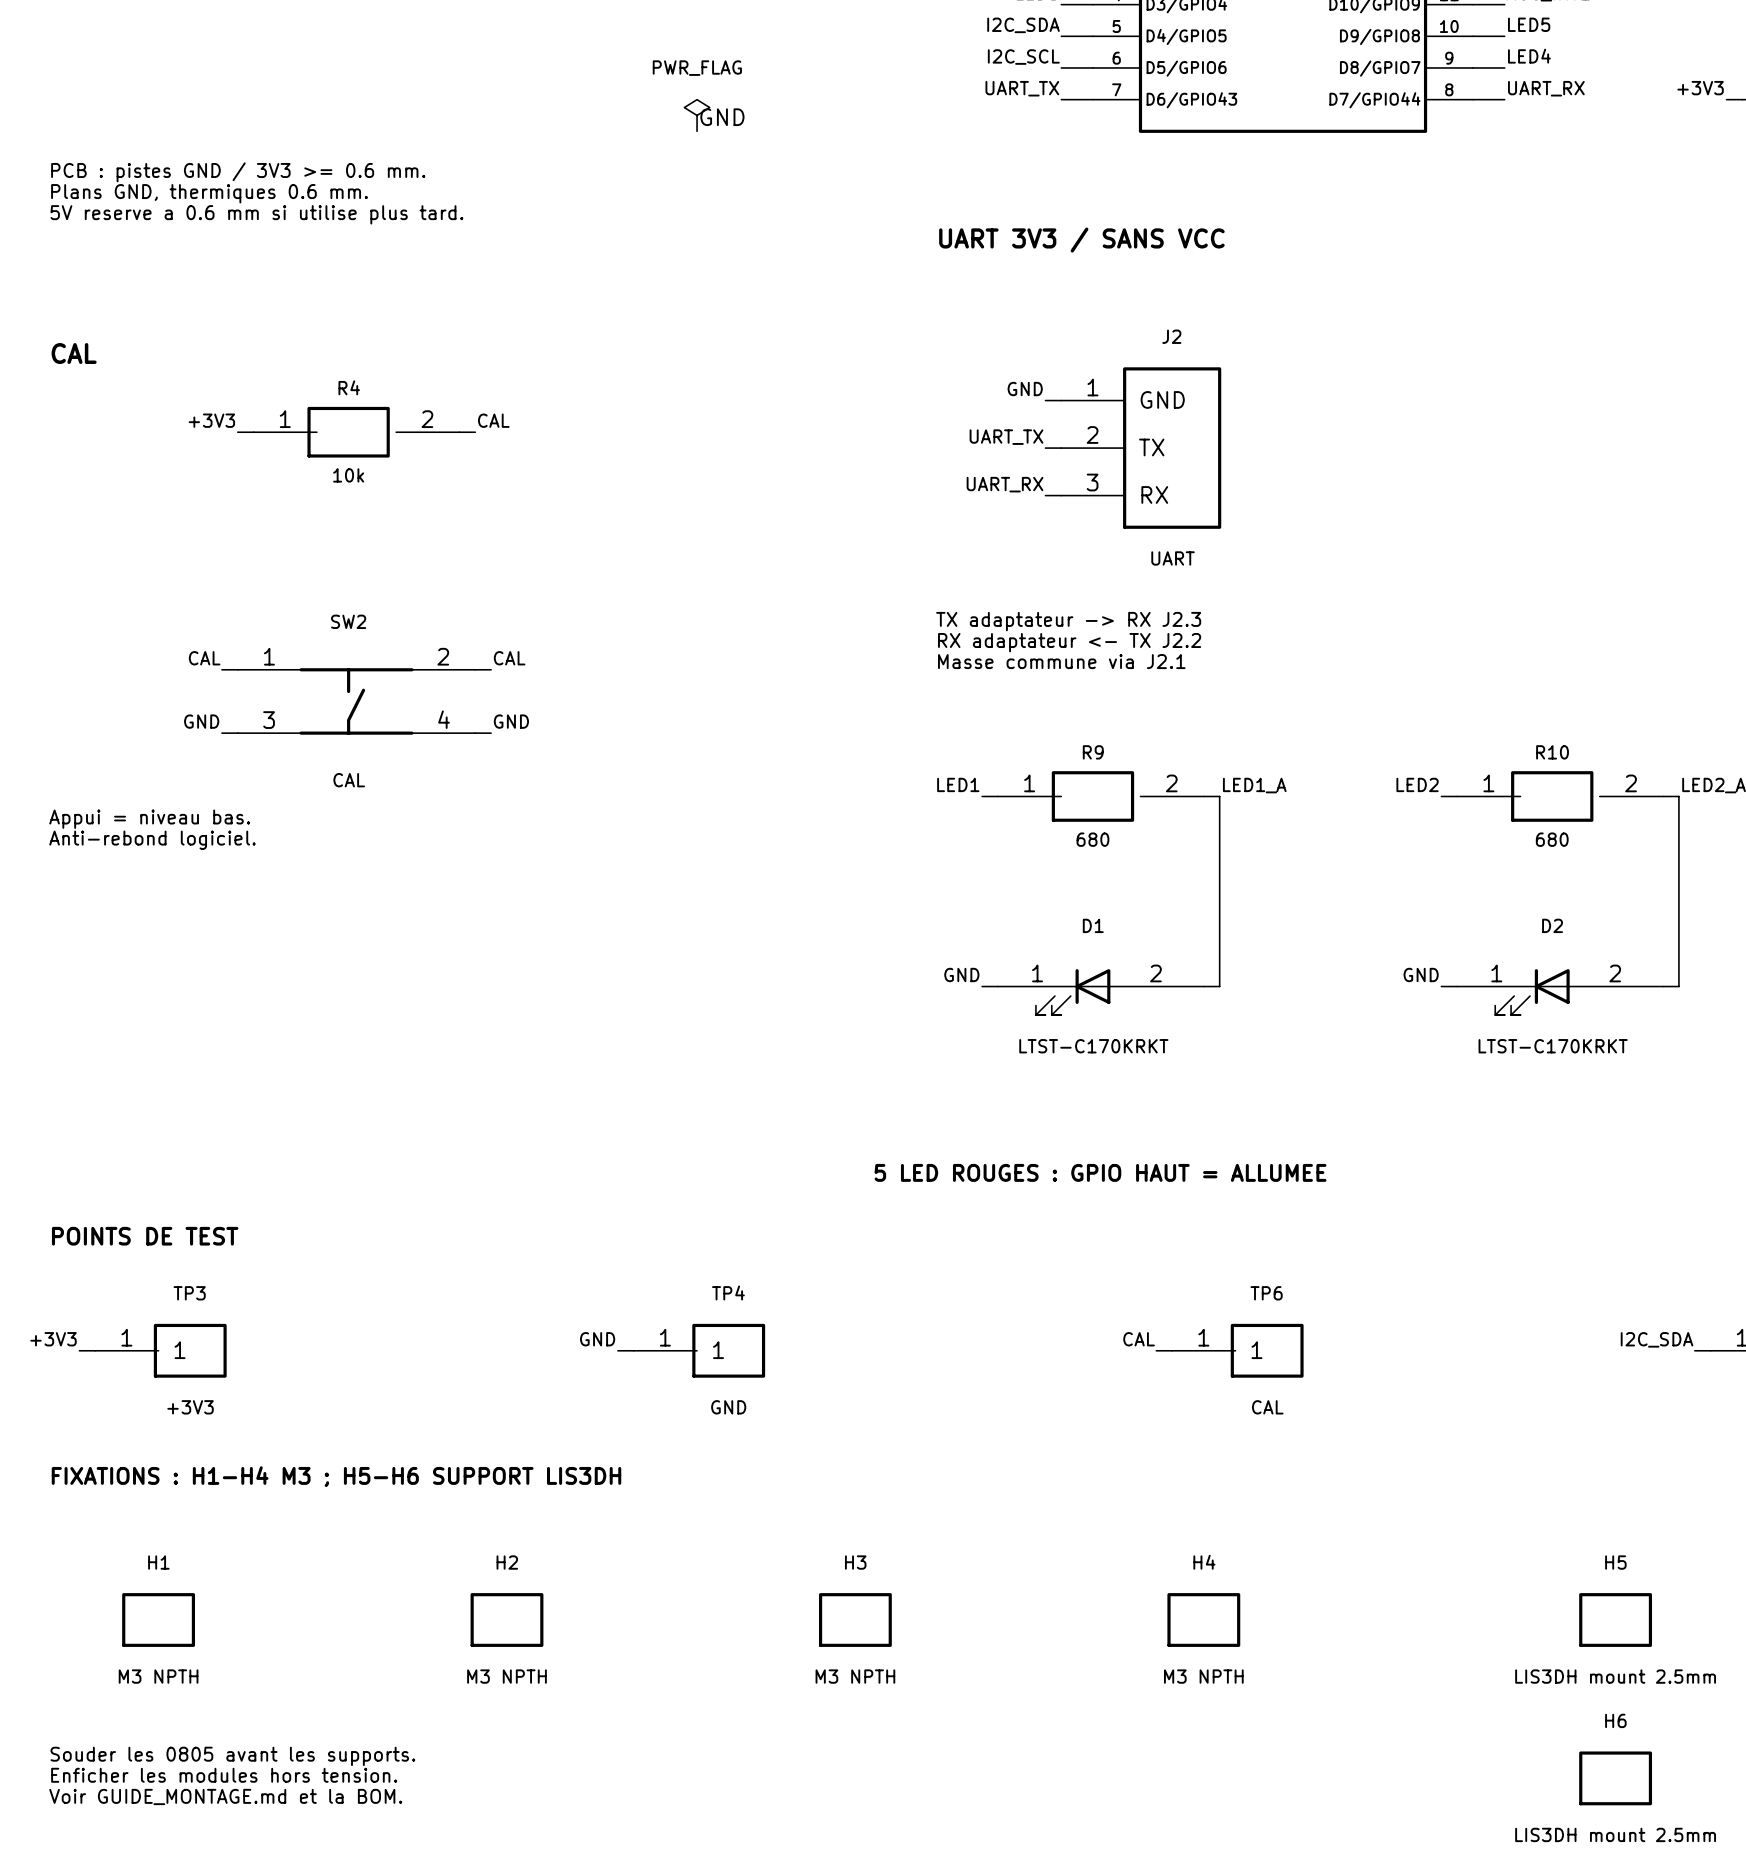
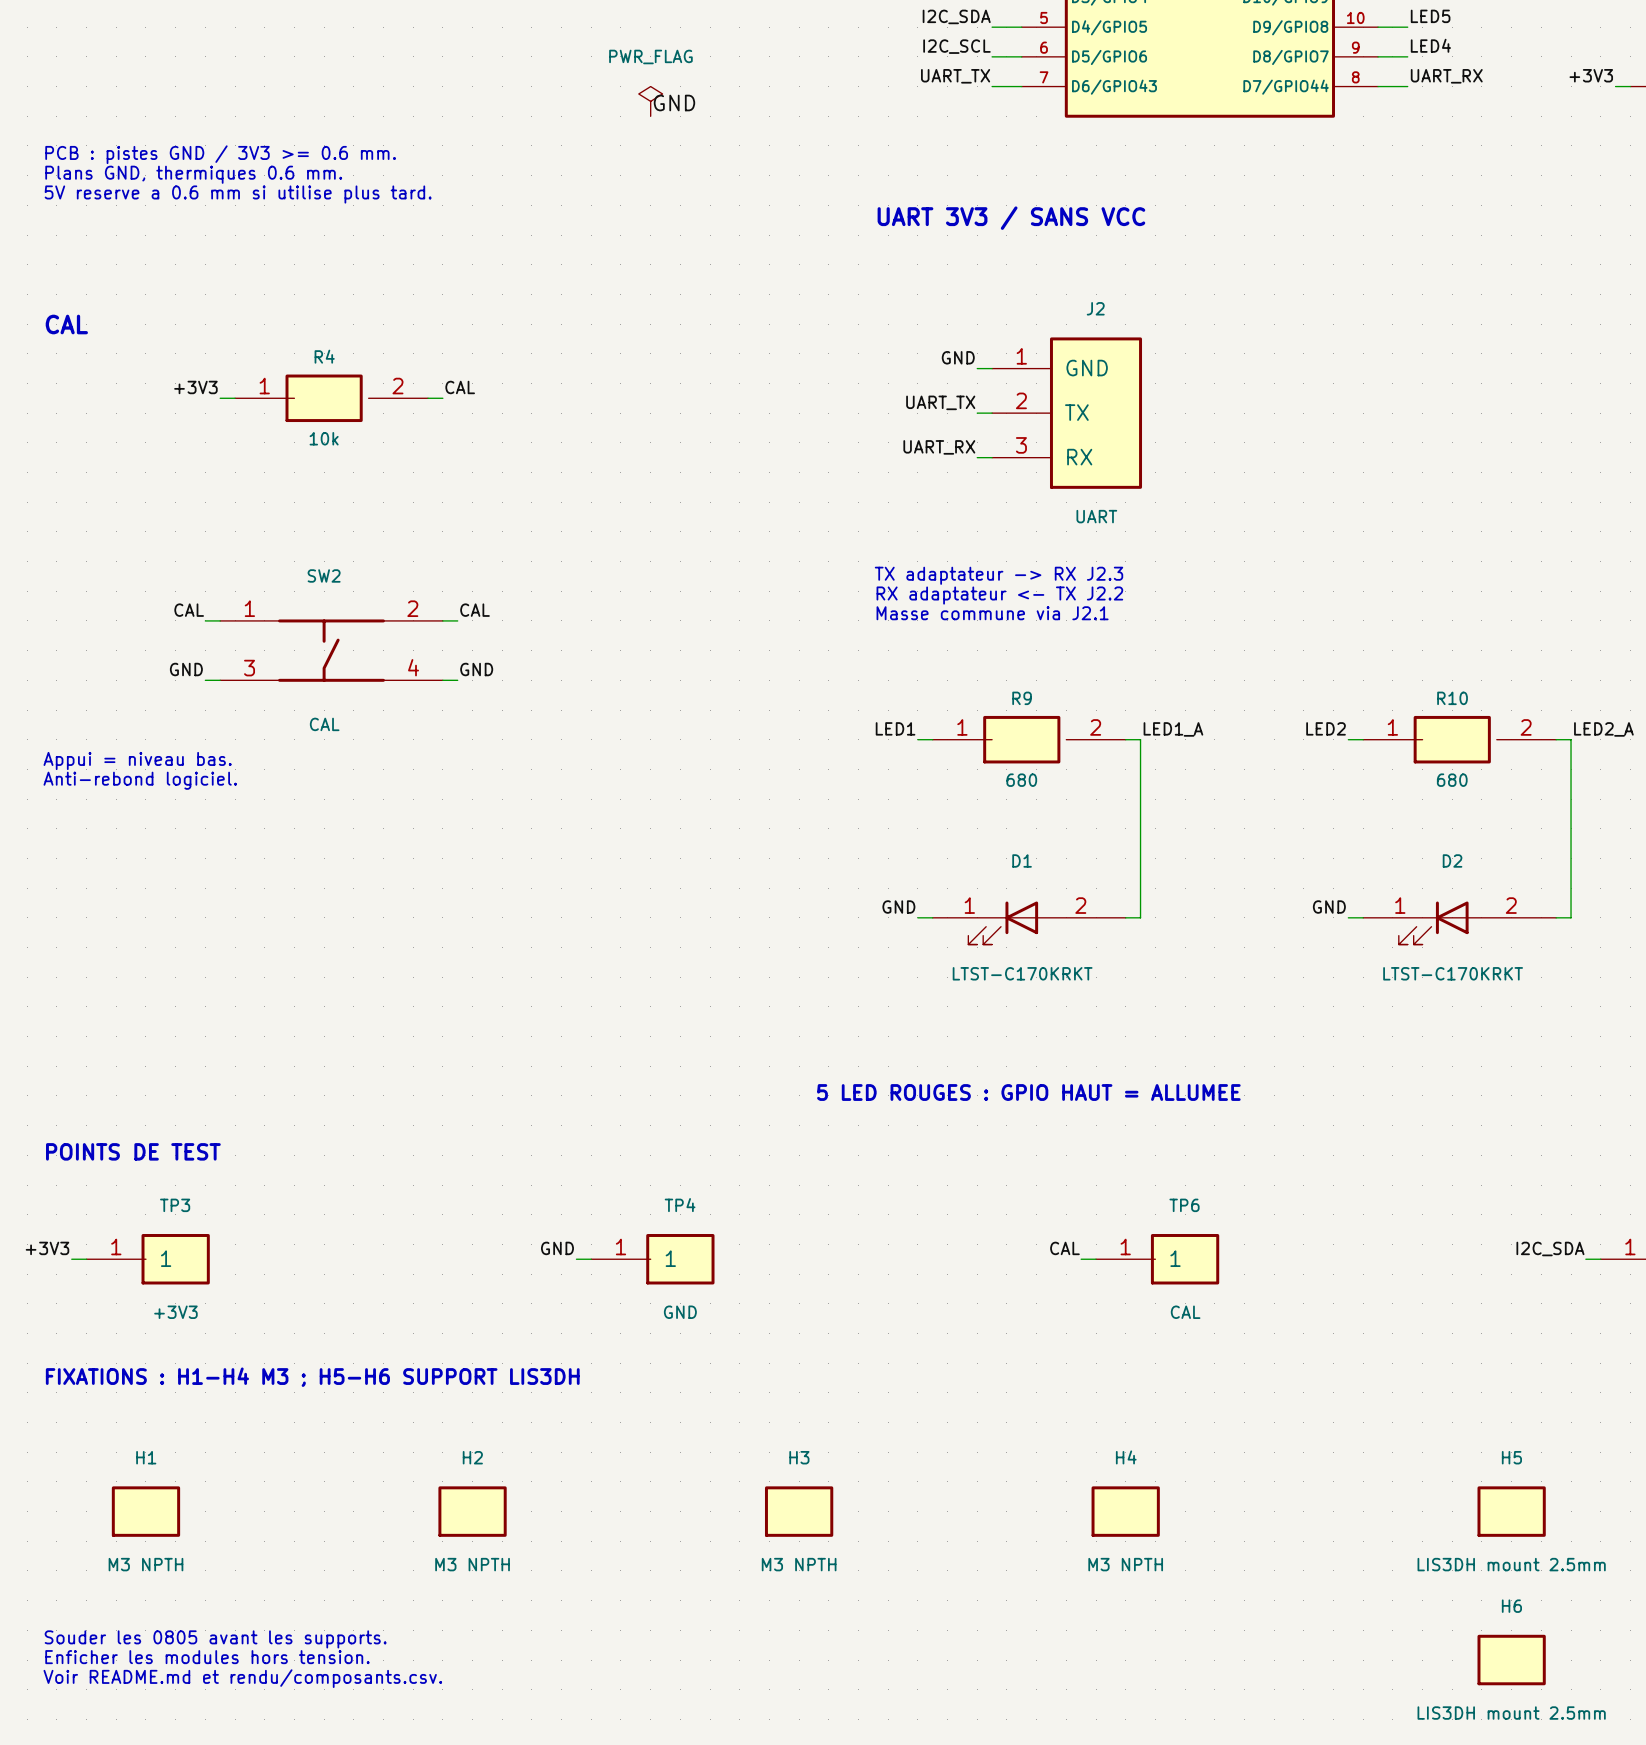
text: Voir GUIDE_MONTAGE.md et la BOM. (225, 1796) -> Voir README.md et rendu/composants.csv. (242, 1678)

